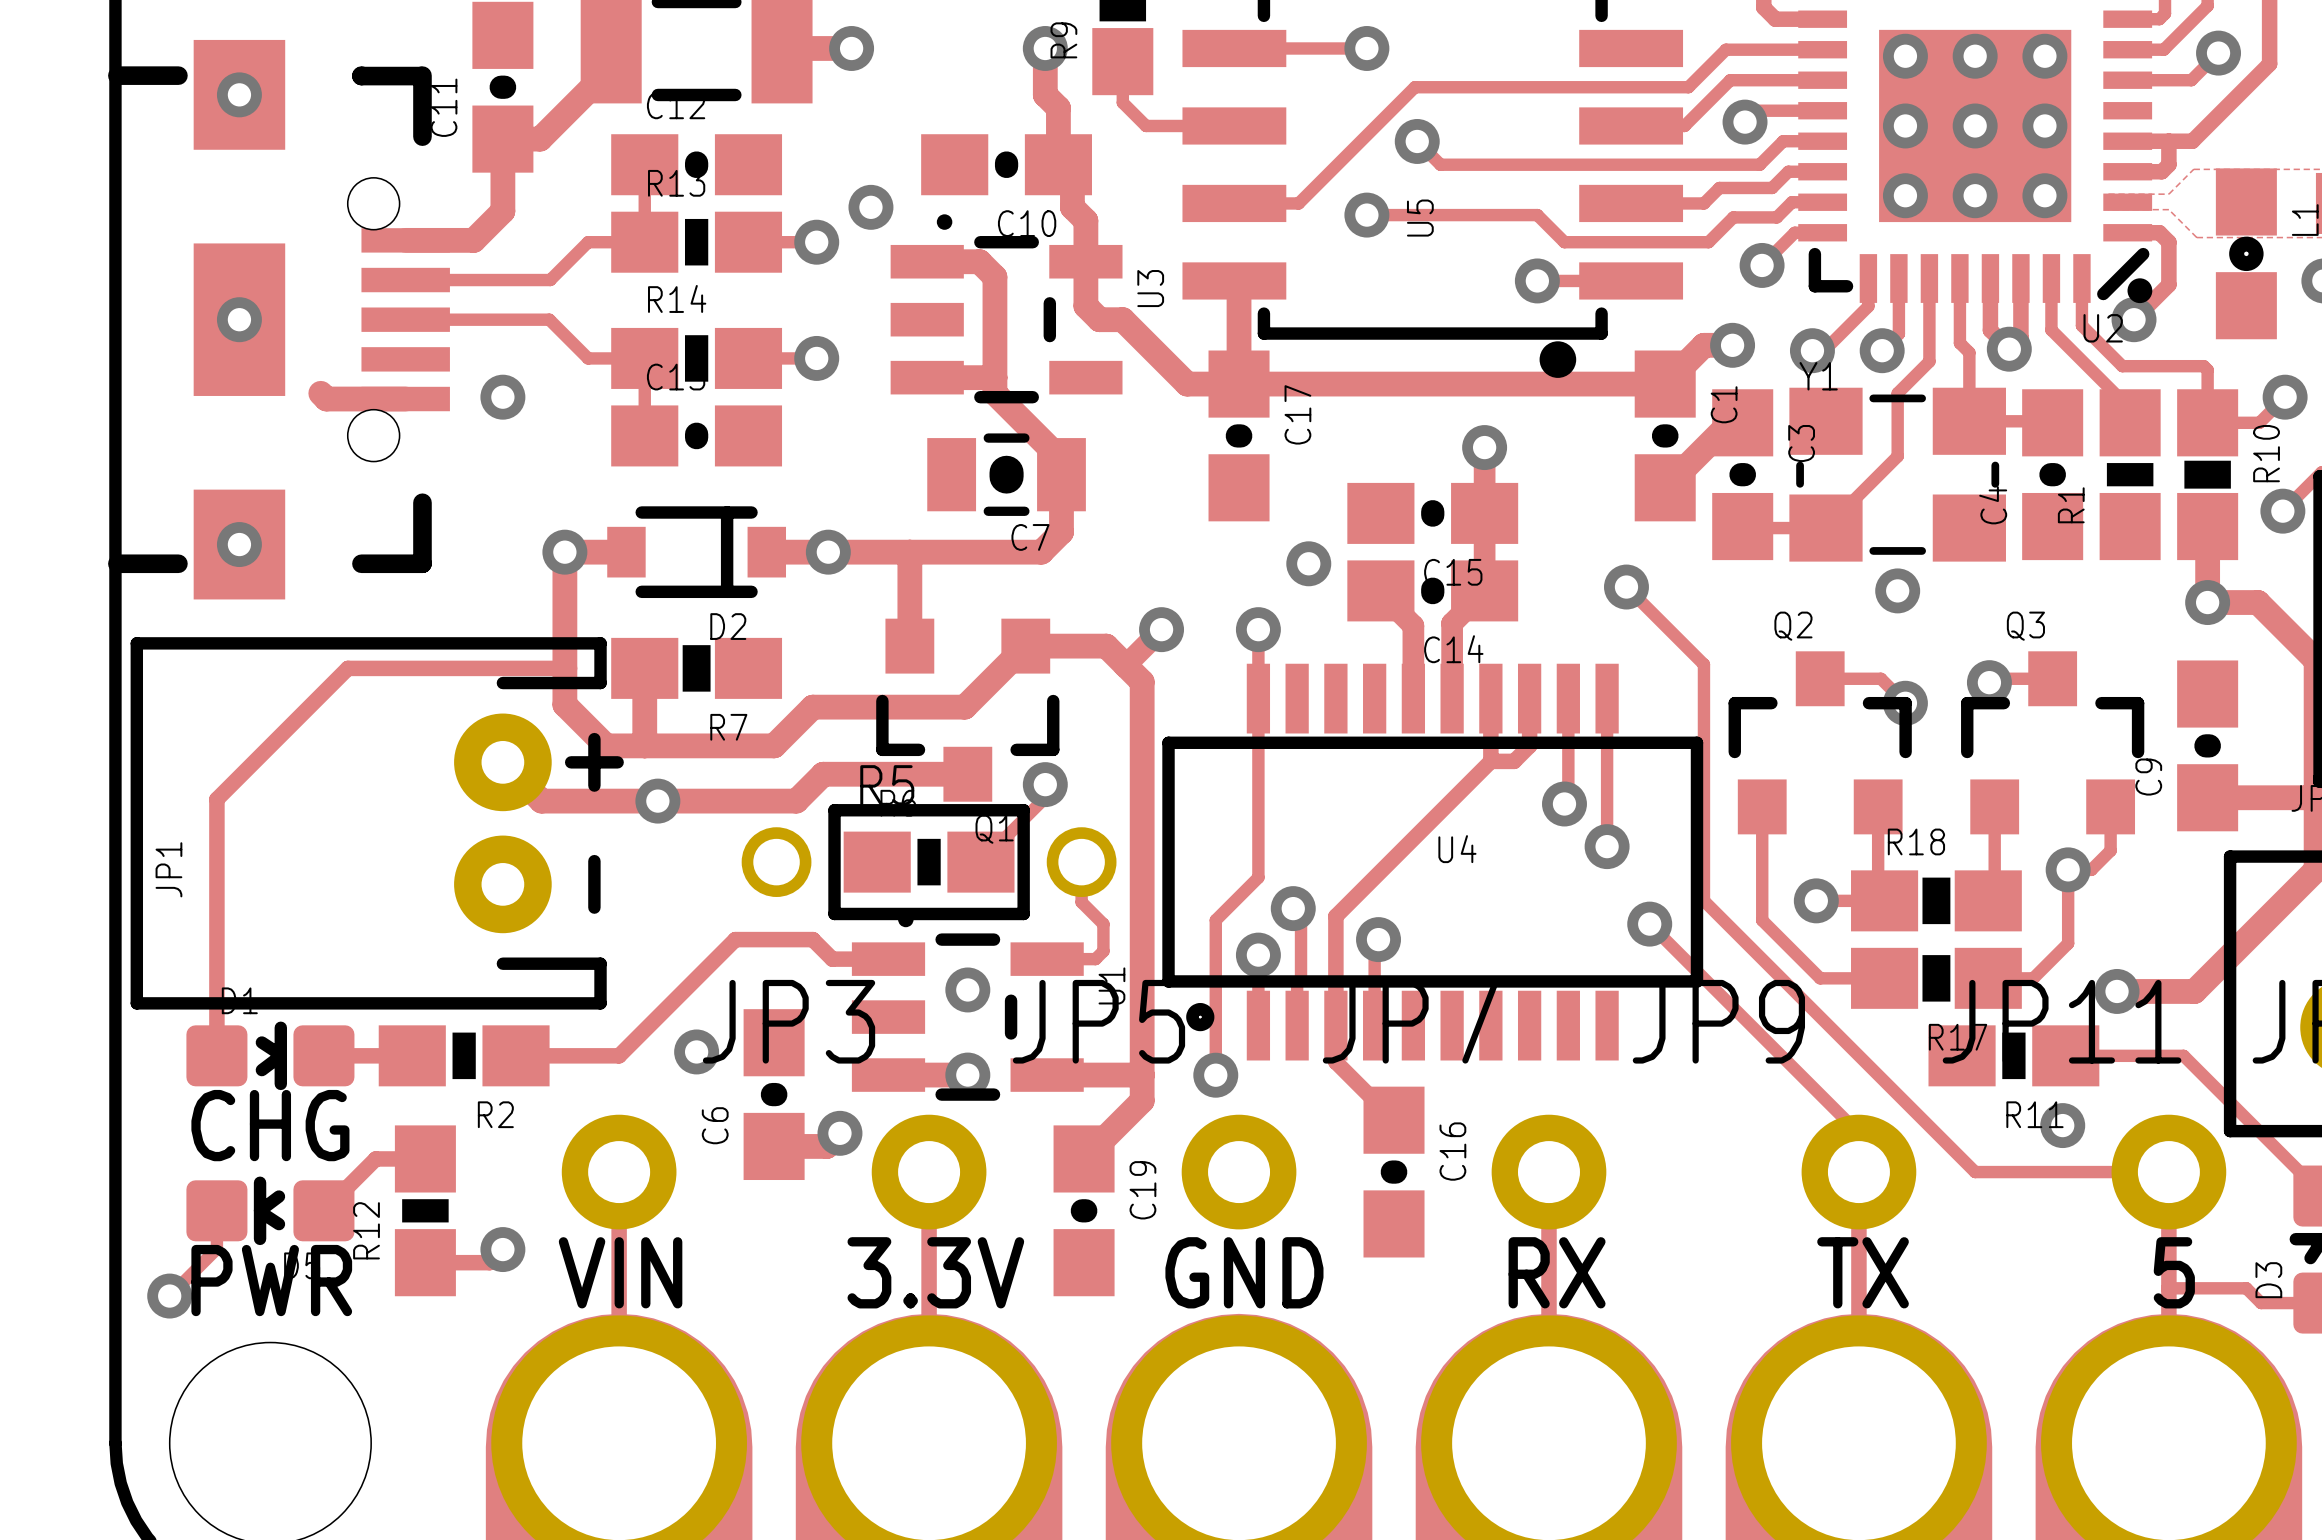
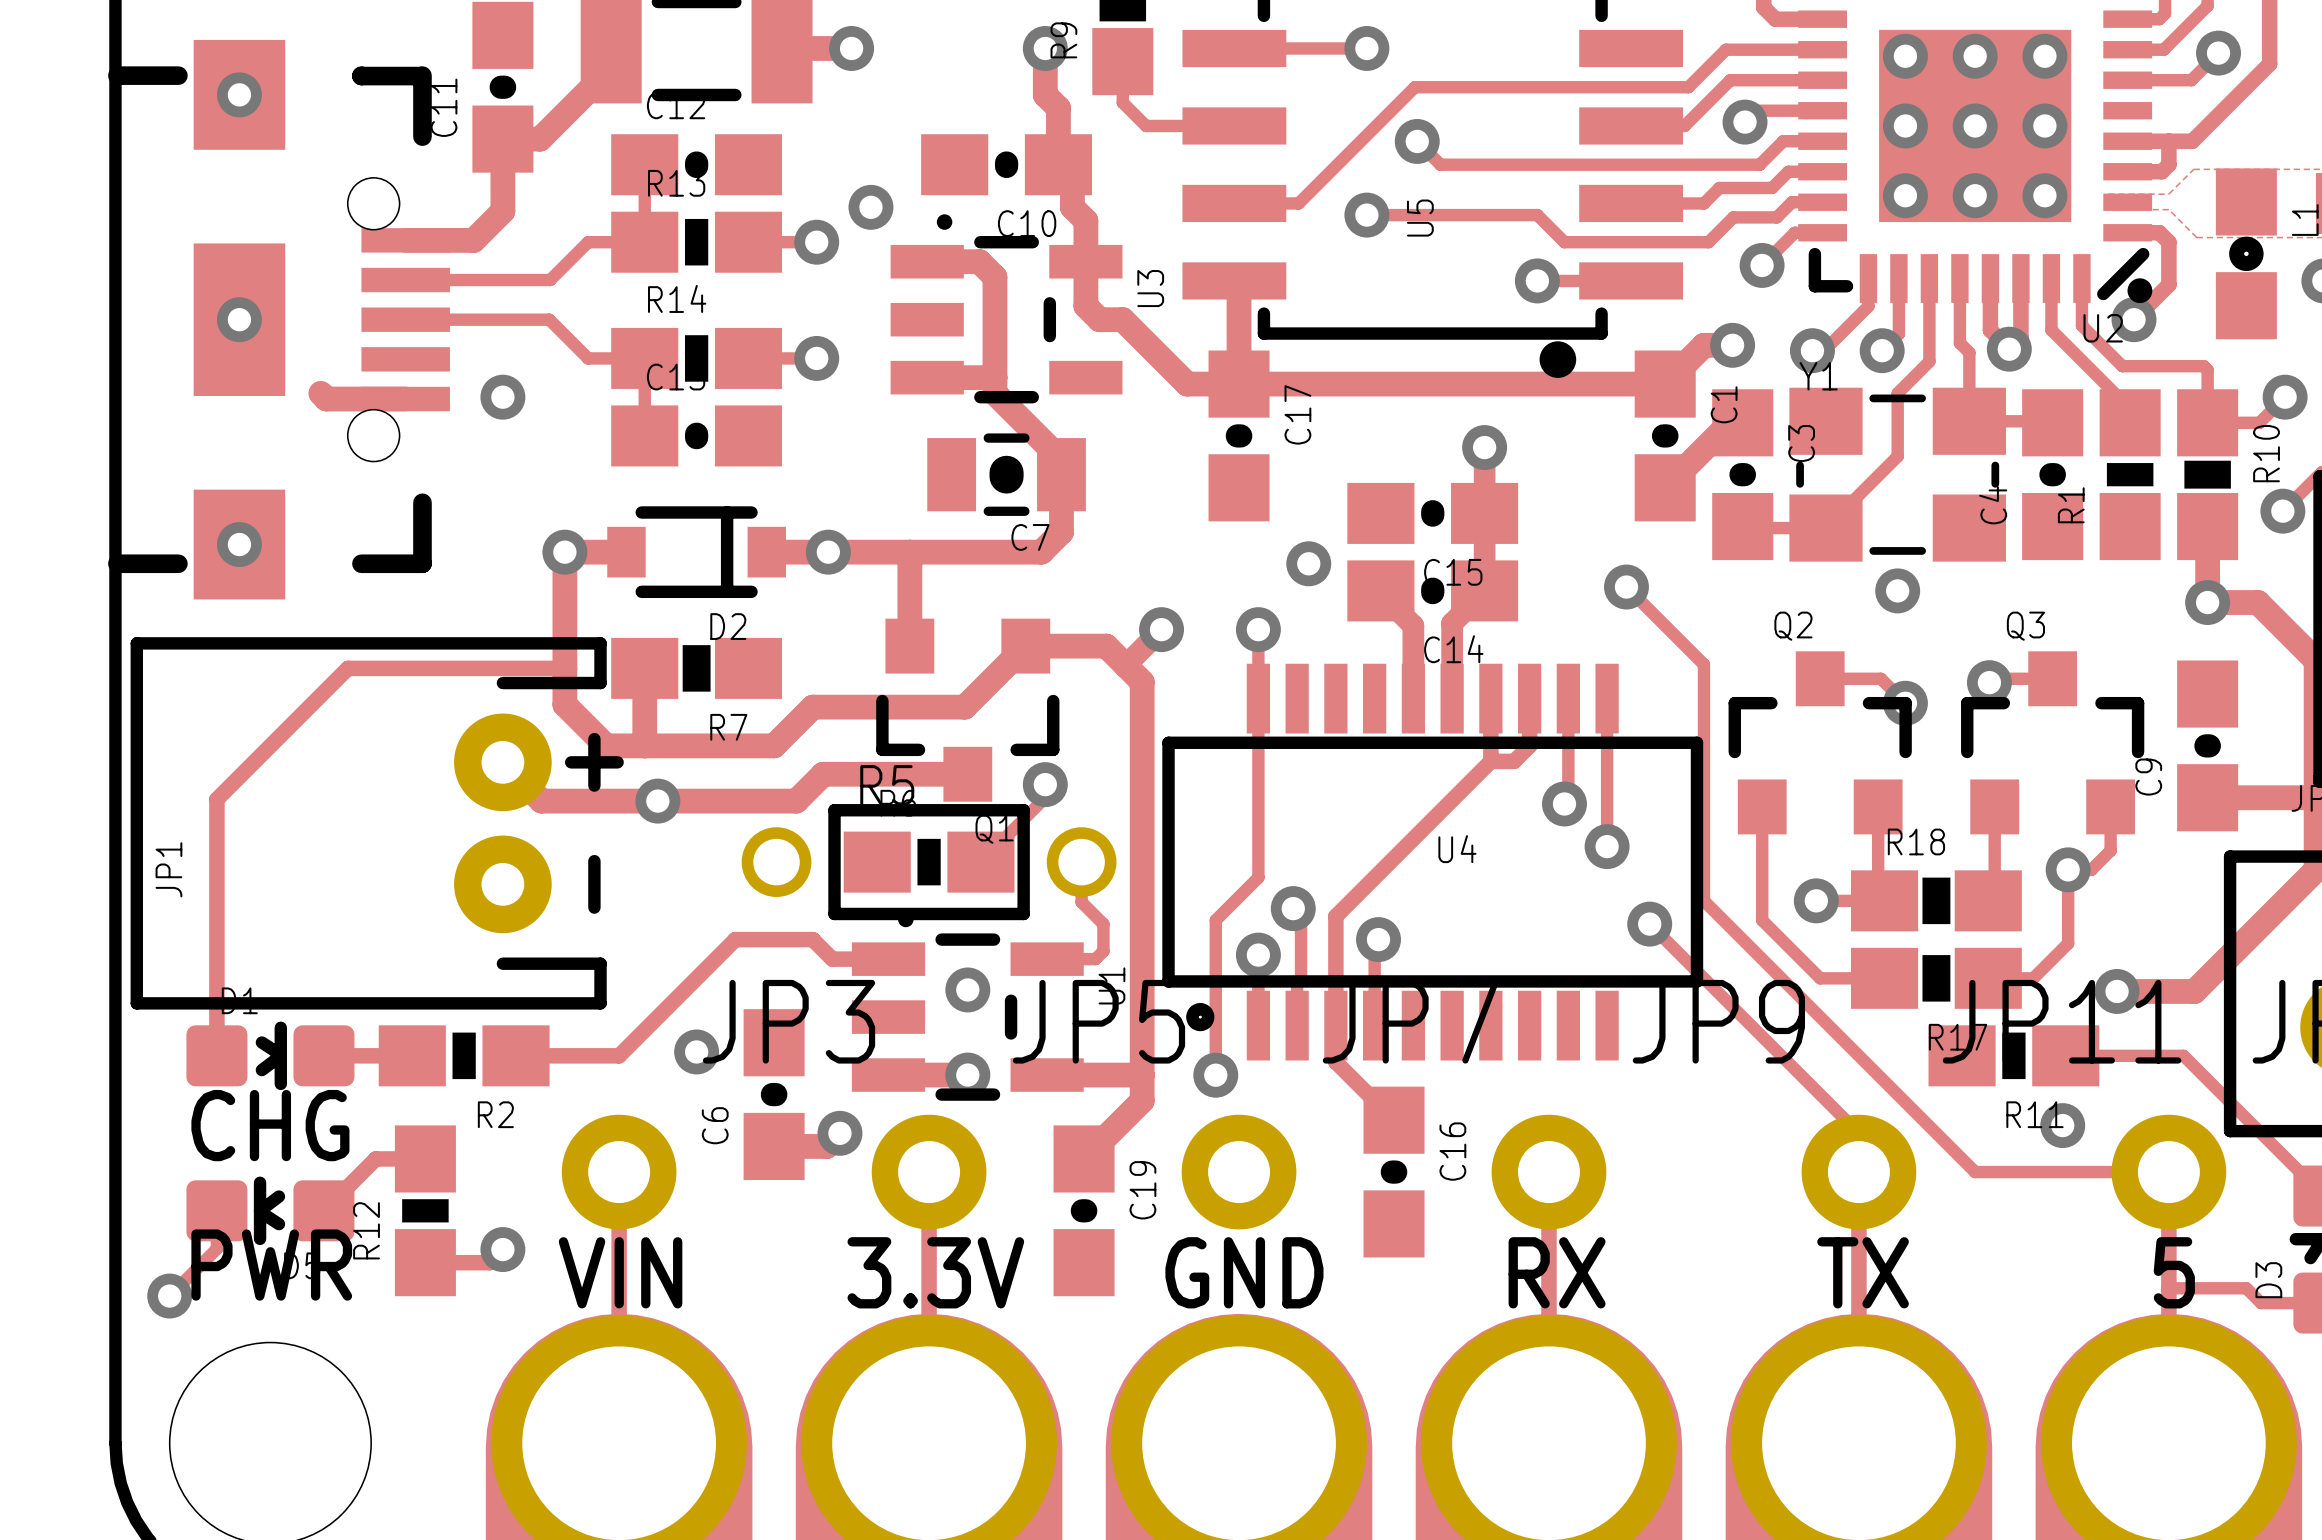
text position: PWR (271, 1280) -> PWR (271, 1265)

